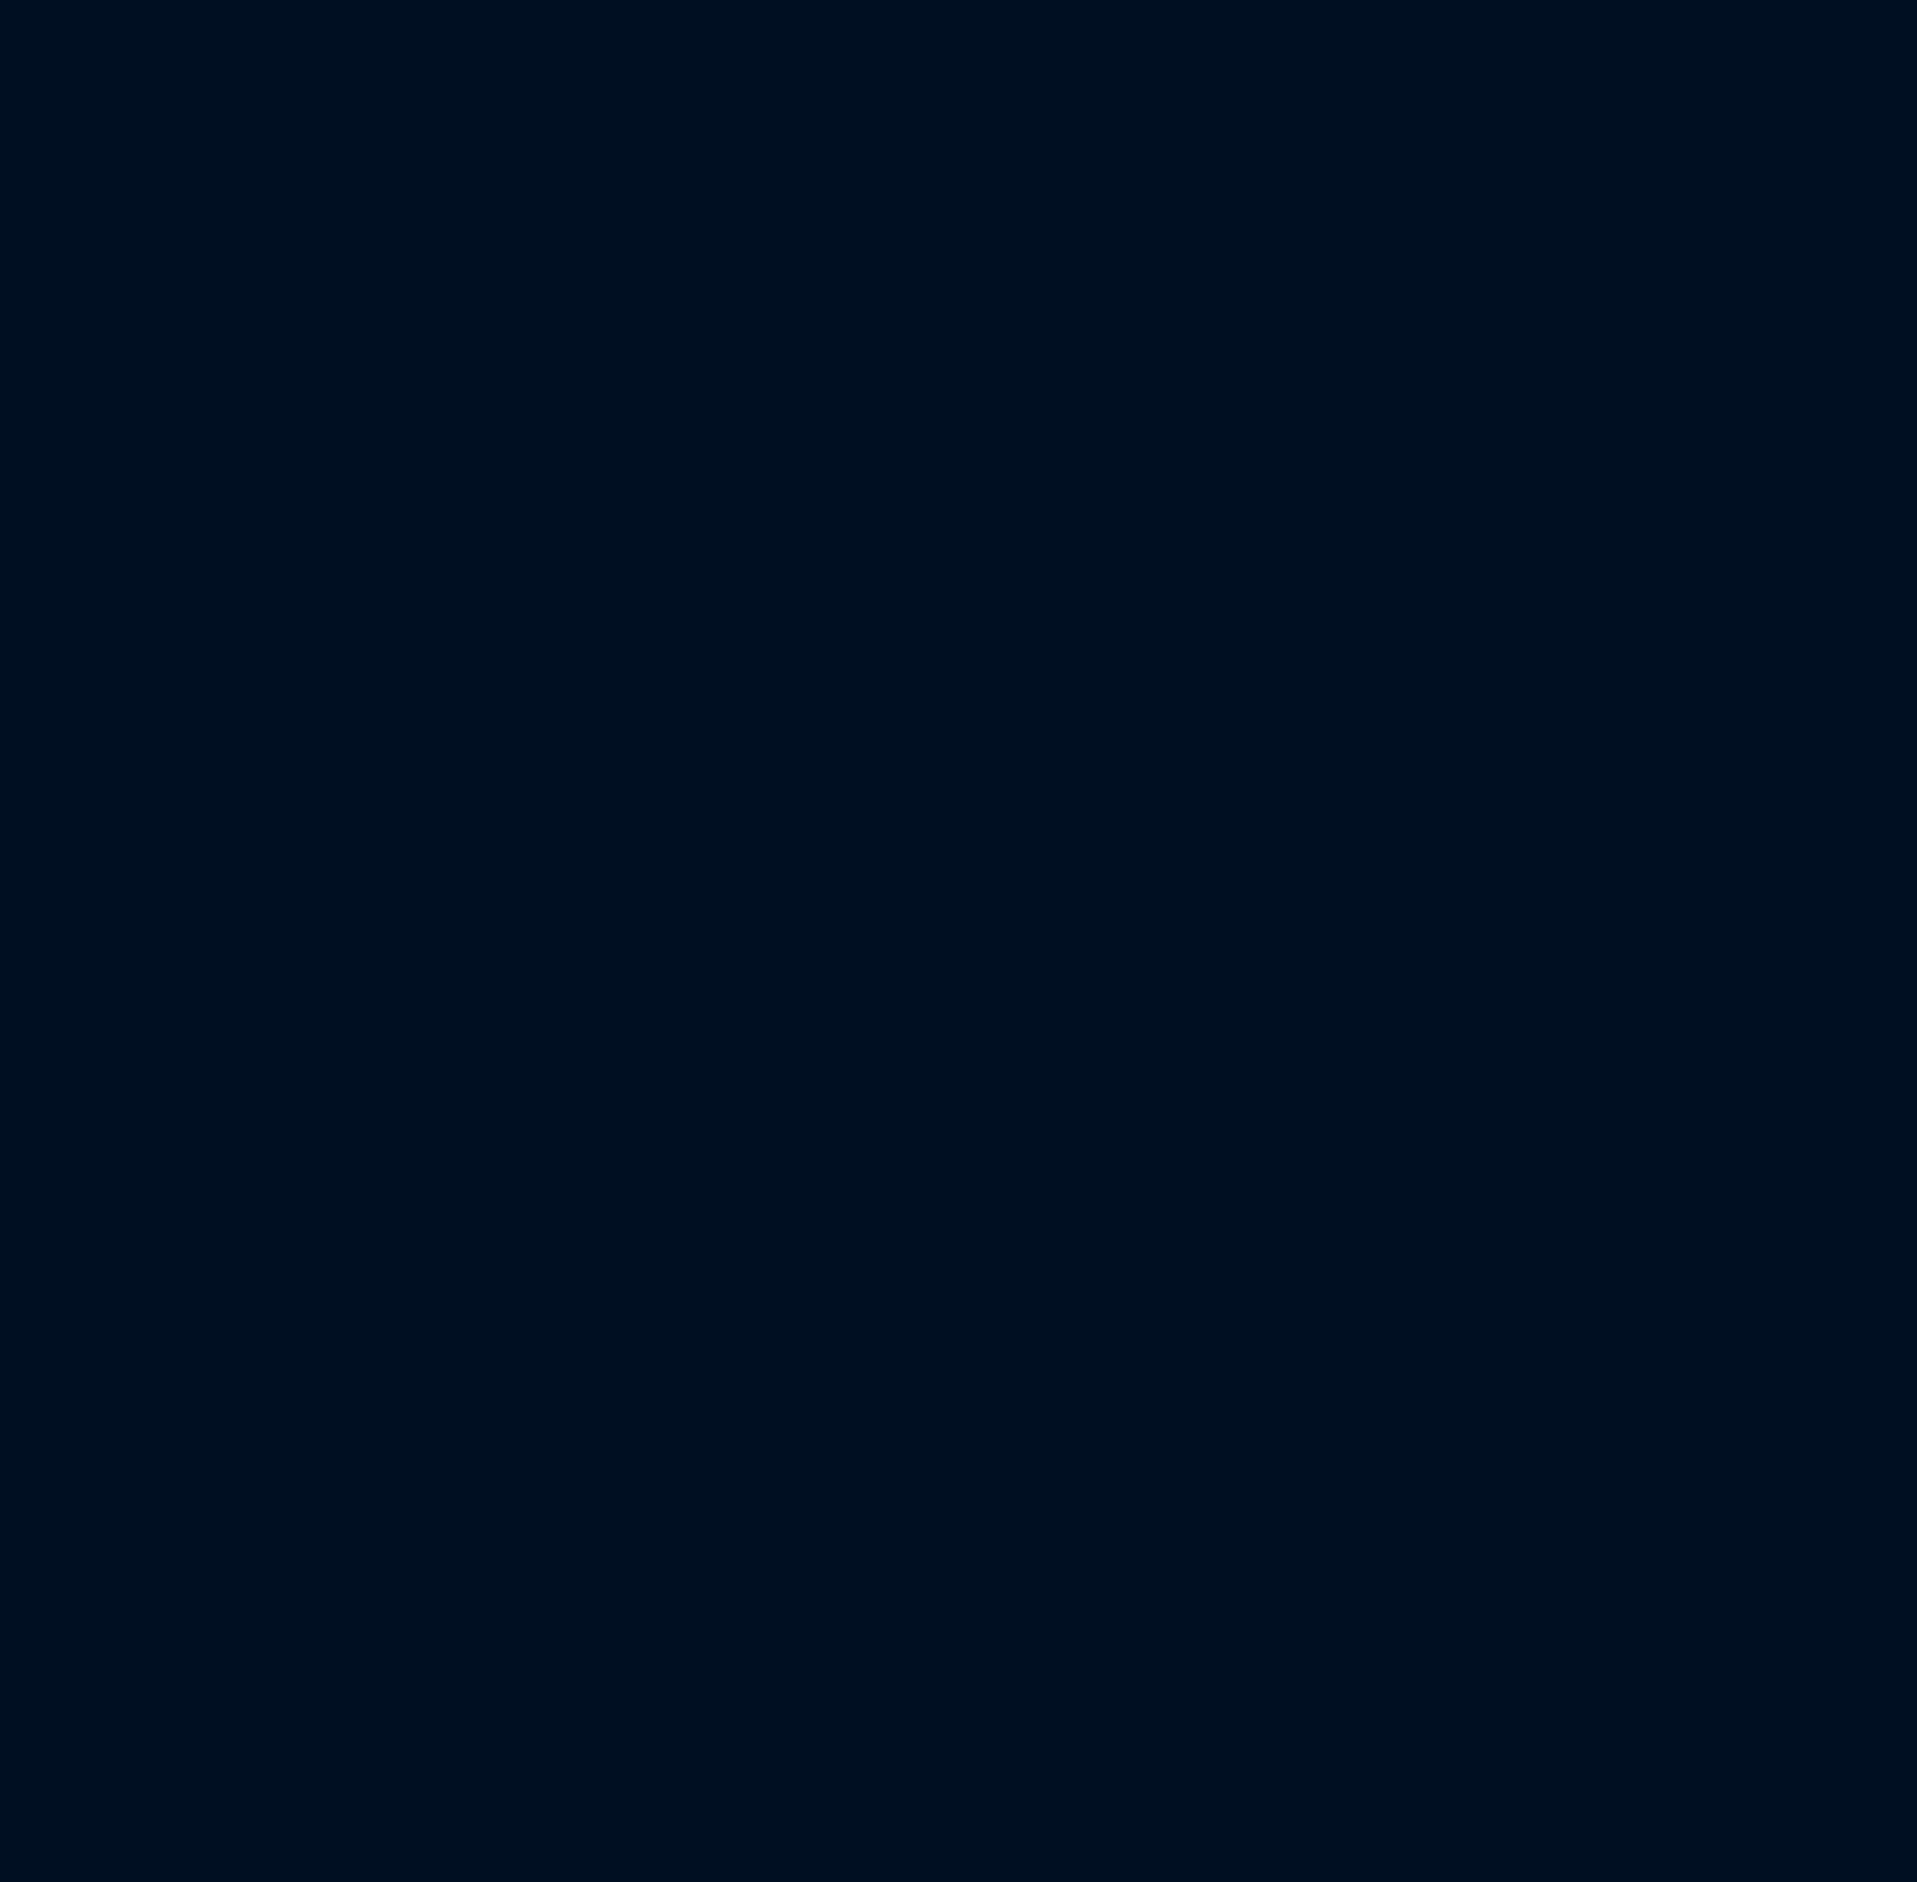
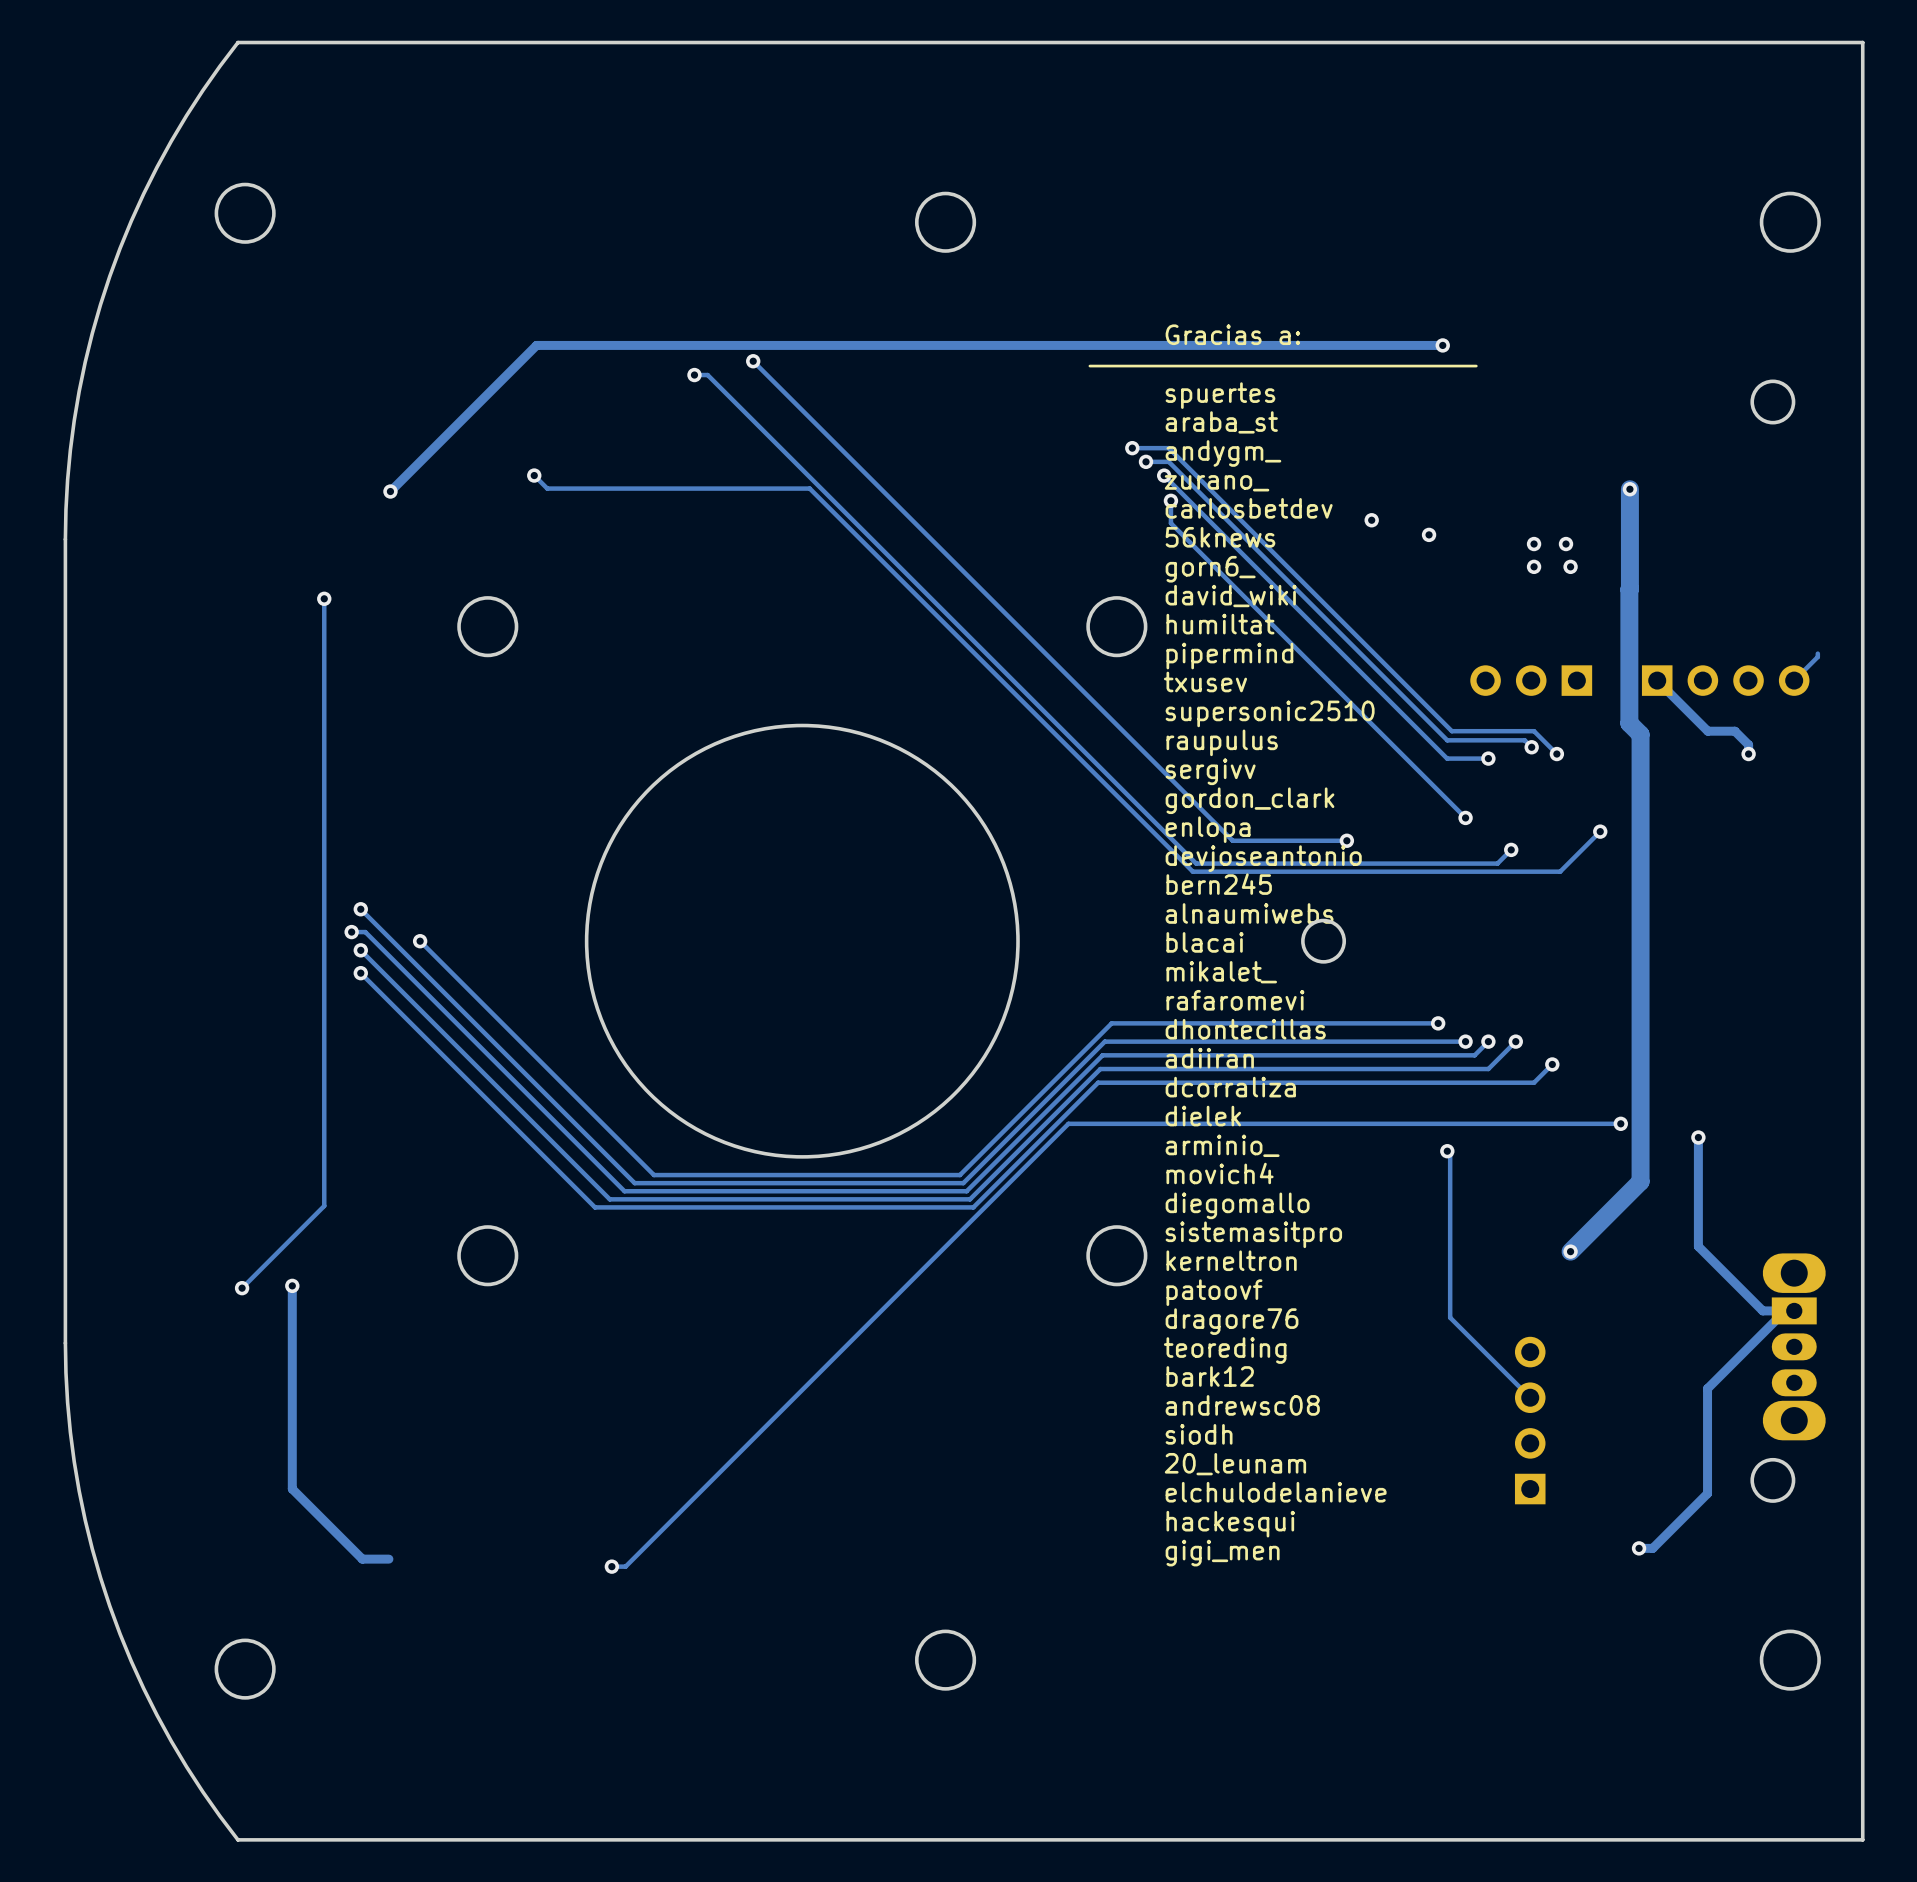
board edge: none -> (1862, 42) (1862, 1839) (237, 1839) (186, 1766) (157, 1715) (131, 1661) (109, 1606) (92, 1549) (74, 1461) (67, 1402) (65, 1343) (65, 539) (67, 479) (74, 420) (92, 333) (109, 276) (131, 220) (157, 167) (202, 90) (237, 42) (1862, 42)
round board edge: none -> [214, 182, 276, 244]
round board edge: none -> [915, 191, 977, 253]
round board edge: none -> [1759, 191, 1821, 253]
text: none -> Gracias a: (1232, 334)
track: none -> (1442, 345) (536, 345) (390, 491)
via: none -> (1442, 345)
track: none -> (753, 361) (1232, 840) (1346, 840)
via: none -> (753, 361)
line: none -> (1476, 366) (1089, 366)
track: none -> (694, 375) (707, 375) (1196, 863) (1497, 863) (1511, 849)
via: none -> (694, 375)
round board edge: none -> [1750, 379, 1796, 425]
text: none -> spuertes (1220, 395)
text: none -> araba_st (1221, 422)
track: none -> (1132, 448) (1168, 448) (1451, 731) (1534, 731) (1556, 754)
via: none -> (1132, 448)
text: none -> andygm_ (1223, 453)
track: none -> (1146, 461) (1168, 461) (1447, 740) (1524, 740) (1531, 747)
via: none -> (1146, 461)
track: none -> (534, 475) (547, 488) (809, 488) (1192, 871) (1560, 871) (1600, 831)
via: none -> (534, 475)
track: none -> (1164, 475) (1447, 758) (1488, 758)
via: none -> (1164, 475)
text: none -> zurano_ (1217, 483)
track: none -> (1629, 489) (1629, 723) (1640, 734) (1640, 1181) (1570, 1251)
via: none -> (1629, 489)
via: none -> (390, 491)
track: none -> (1170, 500) (1170, 523) (1465, 817)
via: none -> (1170, 500)
text: none -> carlosbetdev (1249, 508)
via: none -> (1371, 520)
via: none -> (1429, 534)
text: none -> 56knews (1220, 537)
via: none -> (1534, 544)
via: none -> (1566, 544)
via: none -> (1534, 566)
via: none -> (1570, 566)
text: none -> gorn6_ (1210, 569)
round board edge: none -> [457, 596, 519, 658]
round board edge: none -> [1086, 596, 1148, 658]
text: none -> david_wiki (1231, 596)
track: none -> (324, 598) (324, 1205) (242, 1288)
via: none -> (324, 598)
text: none -> humiltat (1220, 624)
track: none -> (1817, 653) (1817, 656) (1794, 680)
text: none -> pipermind (1229, 656)
part: none -> (1531, 680)
track: none -> (1657, 680) (1707, 731) (1734, 731) (1748, 744) (1748, 754)
part: none -> (1725, 680)
text: none -> txusev (1205, 681)
text: none -> supersonic2510 (1270, 713)
round board edge: none -> [584, 723, 1020, 1159]
text: none -> raupulus (1222, 742)
via: none -> (1531, 747)
via: none -> (1556, 754)
via: none -> (1748, 754)
via: none -> (1488, 758)
text: none -> sergivv (1210, 771)
text: none -> gordon_clark (1250, 800)
via: none -> (1465, 817)
text: none -> enlopa (1208, 829)
via: none -> (1600, 831)
via: none -> (1346, 840)
via: none -> (1511, 849)
text: none -> devjoseantonio (1263, 858)
text: none -> bern245 (1219, 884)
track: none -> (360, 909) (634, 1183) (963, 1183) (1104, 1041) (1465, 1041)
via: none -> (360, 909)
text: none -> alnaumiwebs (1249, 913)
round board edge: none -> [1301, 918, 1347, 964]
track: none -> (351, 932) (365, 932) (624, 1191) (966, 1191) (1102, 1055) (1474, 1055) (1488, 1041)
via: none -> (351, 932)
track: none -> (420, 941) (654, 1175) (959, 1175) (1111, 1023) (1438, 1023)
via: none -> (420, 941)
text: none -> blacai (1205, 942)
track: none -> (360, 950) (609, 1199) (970, 1199) (1100, 1069) (1488, 1069) (1515, 1041)
via: none -> (360, 950)
text: none -> mikalet_ (1221, 972)
track: none -> (360, 973) (595, 1207) (973, 1207) (1098, 1082) (1534, 1082) (1552, 1064)
via: none -> (360, 973)
text: none -> rafaromevi (1235, 1000)
via: none -> (1438, 1023)
text: none -> dhontecillas (1245, 1029)
via: none -> (1465, 1041)
via: none -> (1488, 1041)
via: none -> (1515, 1041)
text: none -> adiiran (1209, 1058)
via: none -> (1552, 1064)
text: none -> dcorraliza (1230, 1087)
text: none -> dielek (1203, 1116)
track: none -> (1620, 1123) (1068, 1123) (625, 1566) (611, 1566)
via: none -> (1620, 1123)
track: none -> (1698, 1137) (1698, 1246) (1762, 1310) (1794, 1310)
via: none -> (1698, 1137)
text: none -> arminio_ (1222, 1145)
track: none -> (1447, 1151) (1450, 1154) (1450, 1317) (1530, 1397)
via: none -> (1447, 1151)
text: none -> movich4 (1220, 1173)
text: none -> diegomallo (1237, 1205)
round board edge: none -> [457, 1225, 519, 1287]
round board edge: none -> [1086, 1225, 1148, 1287]
text: none -> sistemasitpro (1253, 1234)
via: none -> (1570, 1251)
text: none -> kerneltron (1231, 1260)
track: none -> (292, 1285) (292, 1489) (362, 1559) (388, 1559)
via: none -> (292, 1285)
via: none -> (242, 1288)
text: none -> patoovf (1214, 1292)
track: none -> (1785, 1310) (1707, 1388) (1707, 1493) (1652, 1548) (1639, 1548)
text: none -> dragore76 (1232, 1321)
part: none -> (1794, 1346)
text: none -> teoreding (1225, 1350)
text: none -> bark12 (1210, 1376)
text: none -> andrewsc08 (1242, 1405)
part: none -> (1530, 1420)
text: none -> siodh (1199, 1434)
round board edge: none -> [1750, 1457, 1796, 1503]
text: none -> 20_leunam (1235, 1464)
text: none -> elchulodelanieve (1276, 1492)
text: none -> hackesqui (1230, 1524)
via: none -> (1639, 1548)
text: none -> gigi_men (1222, 1553)
via: none -> (611, 1566)
round board edge: none -> [915, 1629, 977, 1691]
round board edge: none -> [1759, 1629, 1821, 1691]
round board edge: none -> [214, 1638, 276, 1700]

